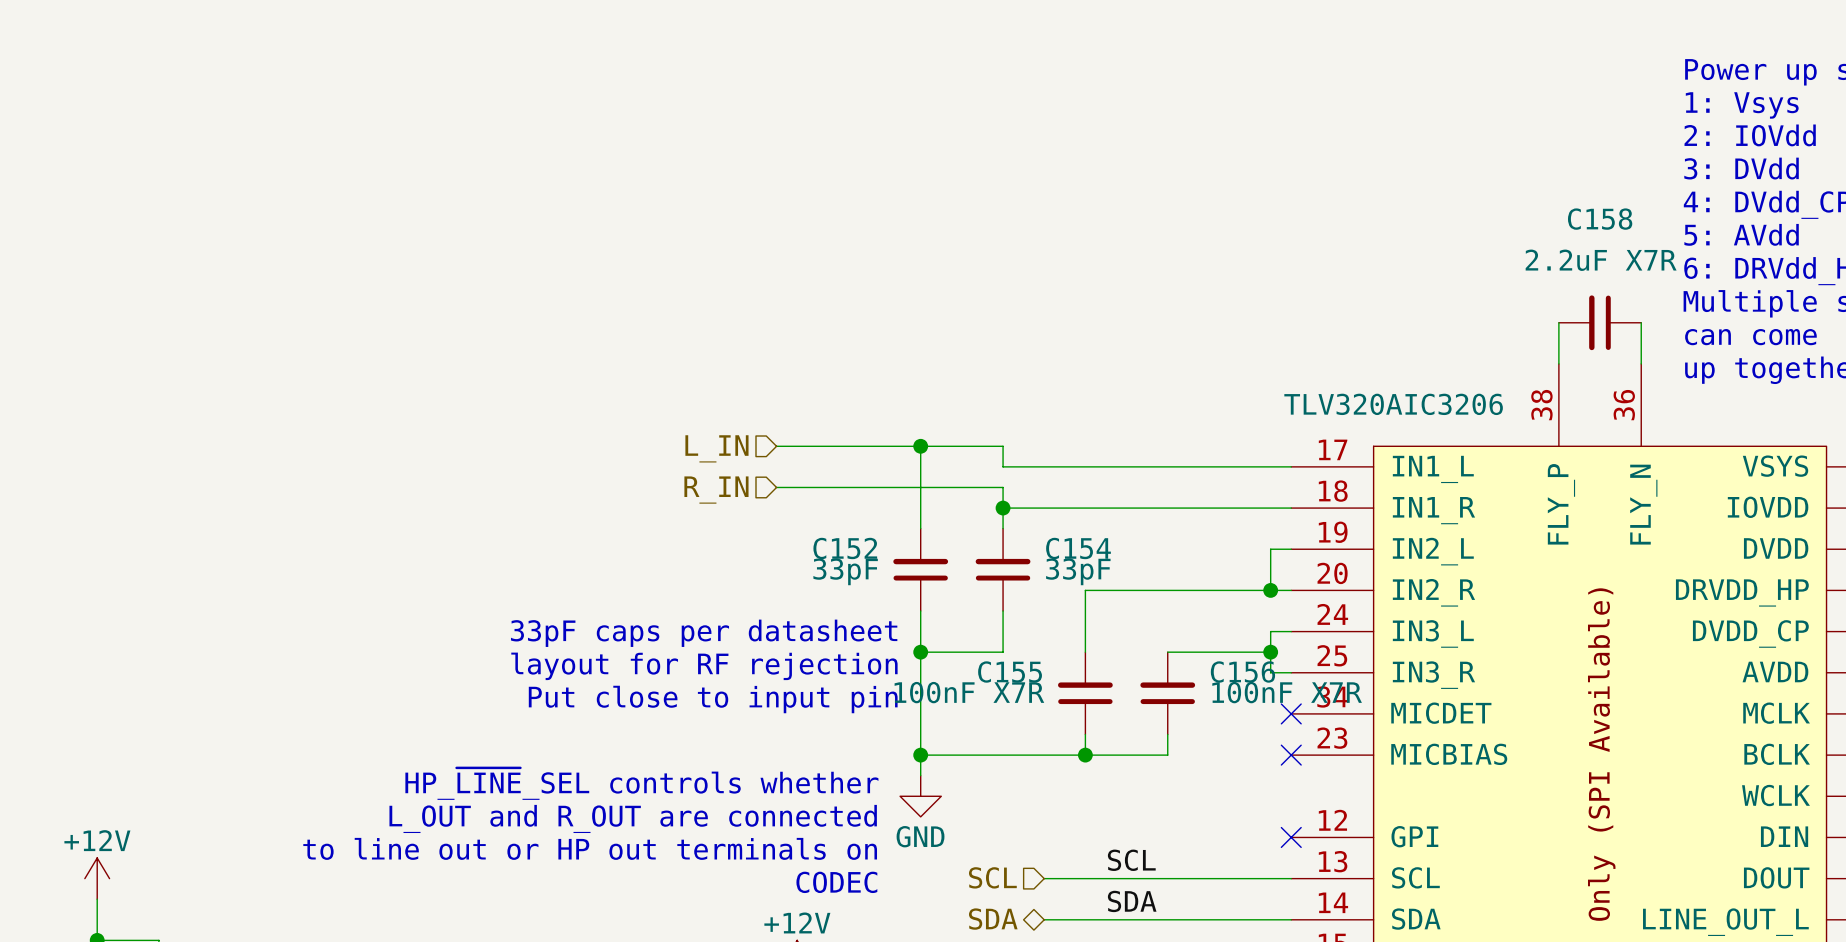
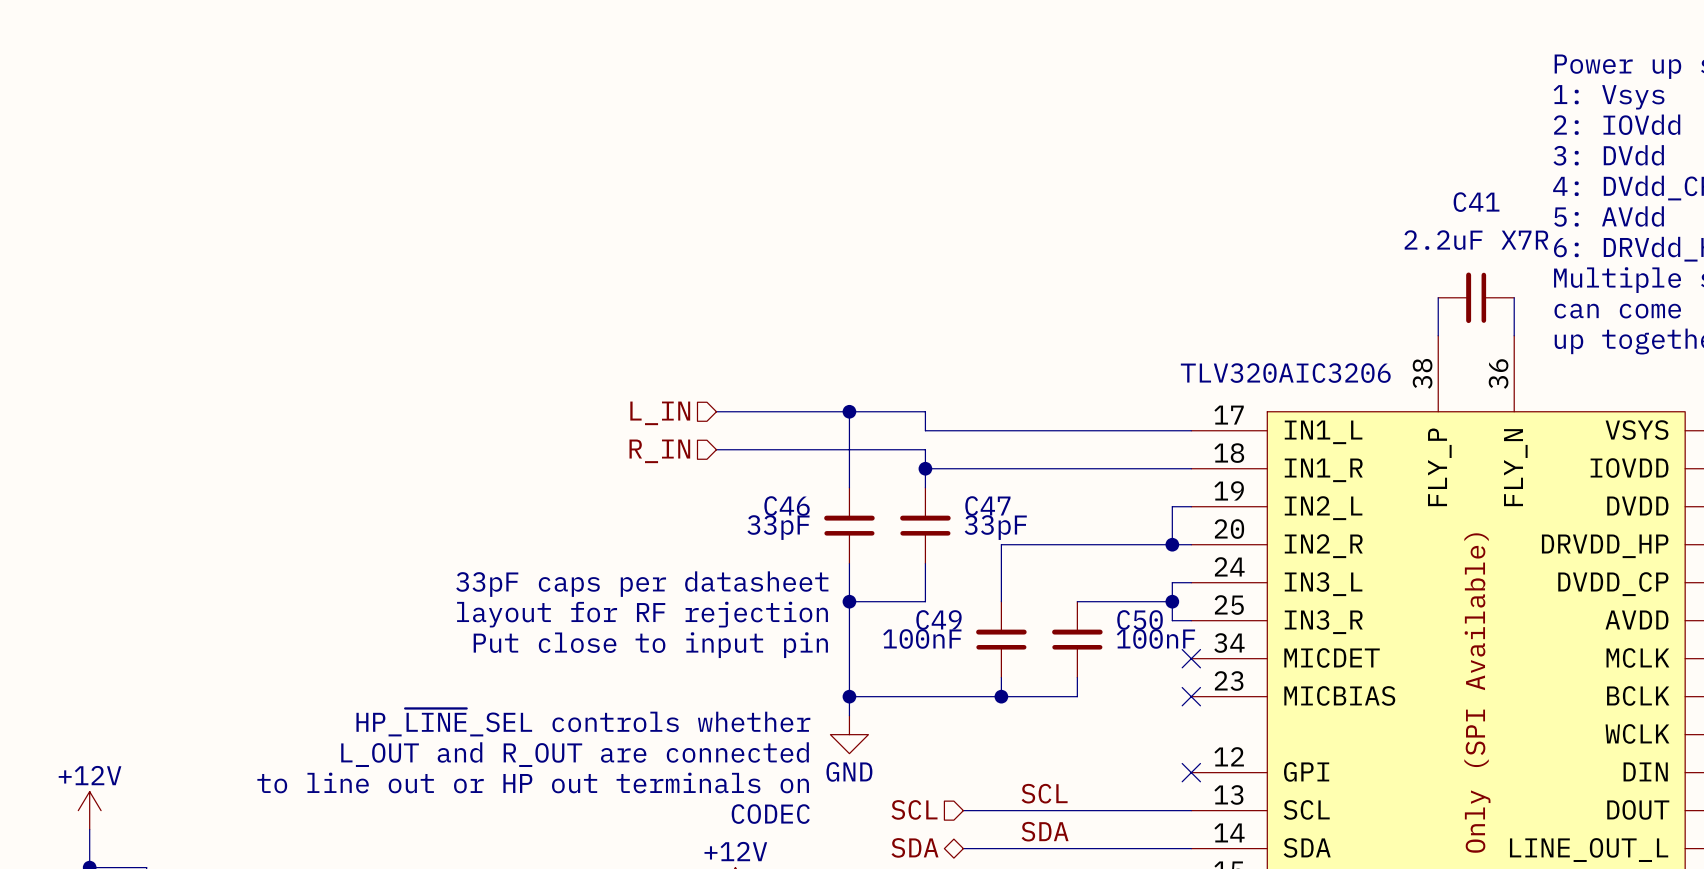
C158 name: C158 (1600, 219) -> C41 (1476, 202)
C152 name: C152 (845, 548) -> C46 (787, 506)
C154 name: C154 (1078, 548) -> C47 (987, 506)
C155 name: C155 (1010, 672) -> C49 (938, 619)
C156 name: C156 (1242, 672) -> C50 (1140, 619)
C155 value: 100nF X7R (969, 692) -> 100nF (922, 638)
C156 value: 100nF X7R (1287, 692) -> 100nF (1155, 638)

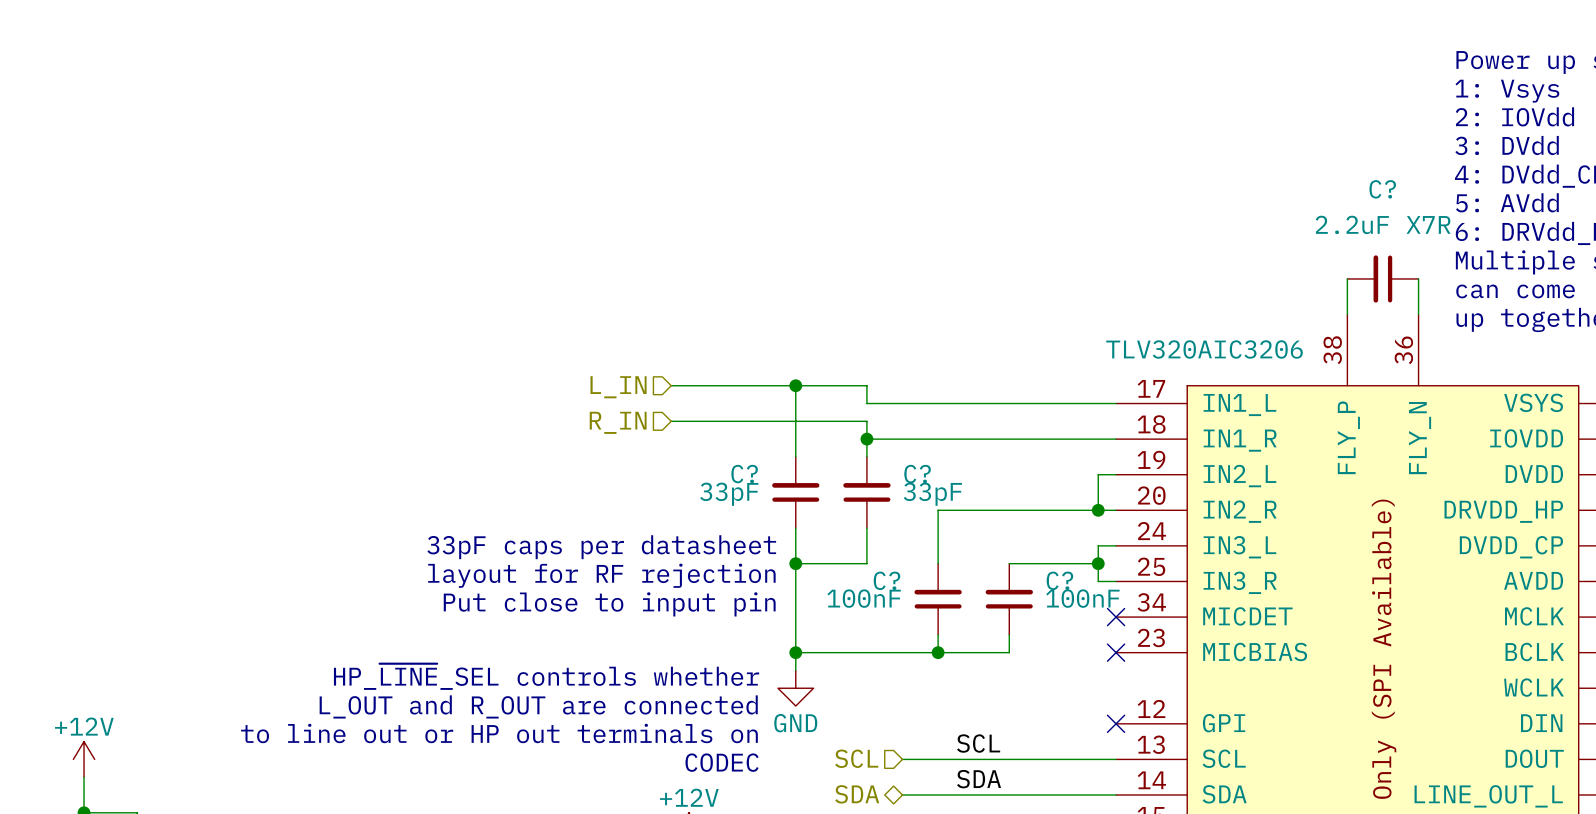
C41 name: C41 (1476, 202) -> C? (1382, 189)
C46 name: C46 (787, 506) -> C? (744, 474)
C47 name: C47 (987, 506) -> C? (917, 474)
C49 name: C49 (938, 619) -> C? (886, 580)
C50 name: C50 (1140, 619) -> C? (1059, 580)

